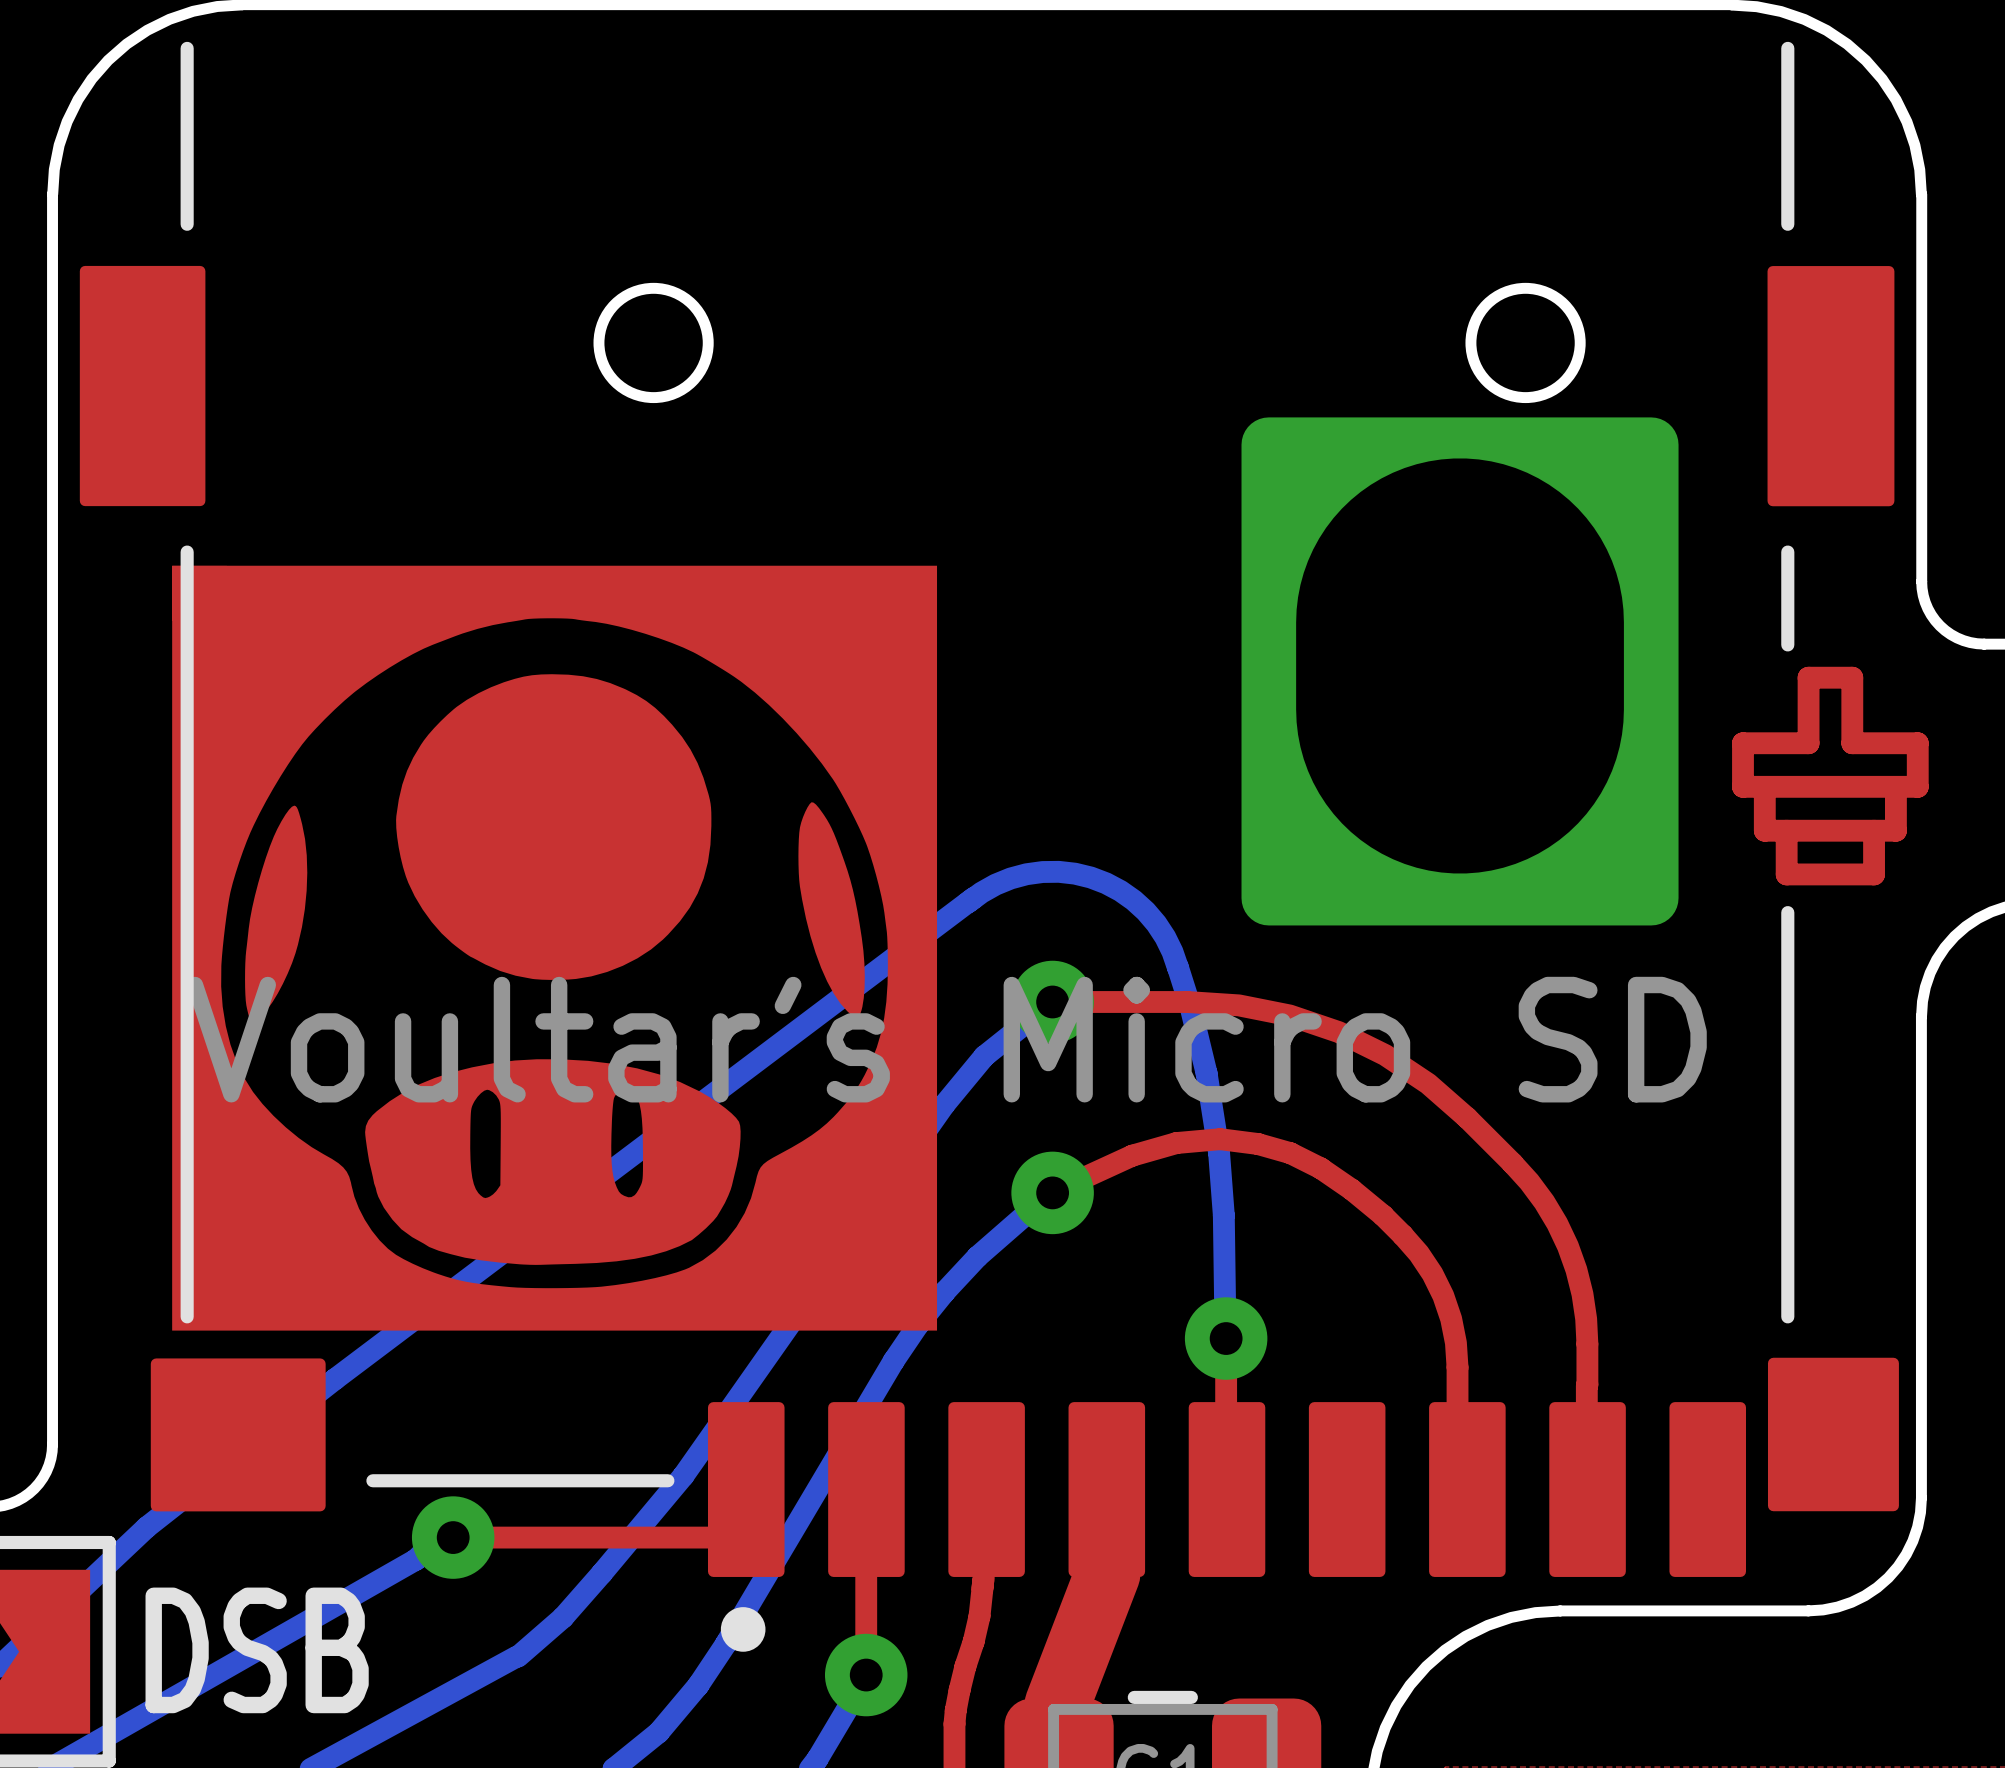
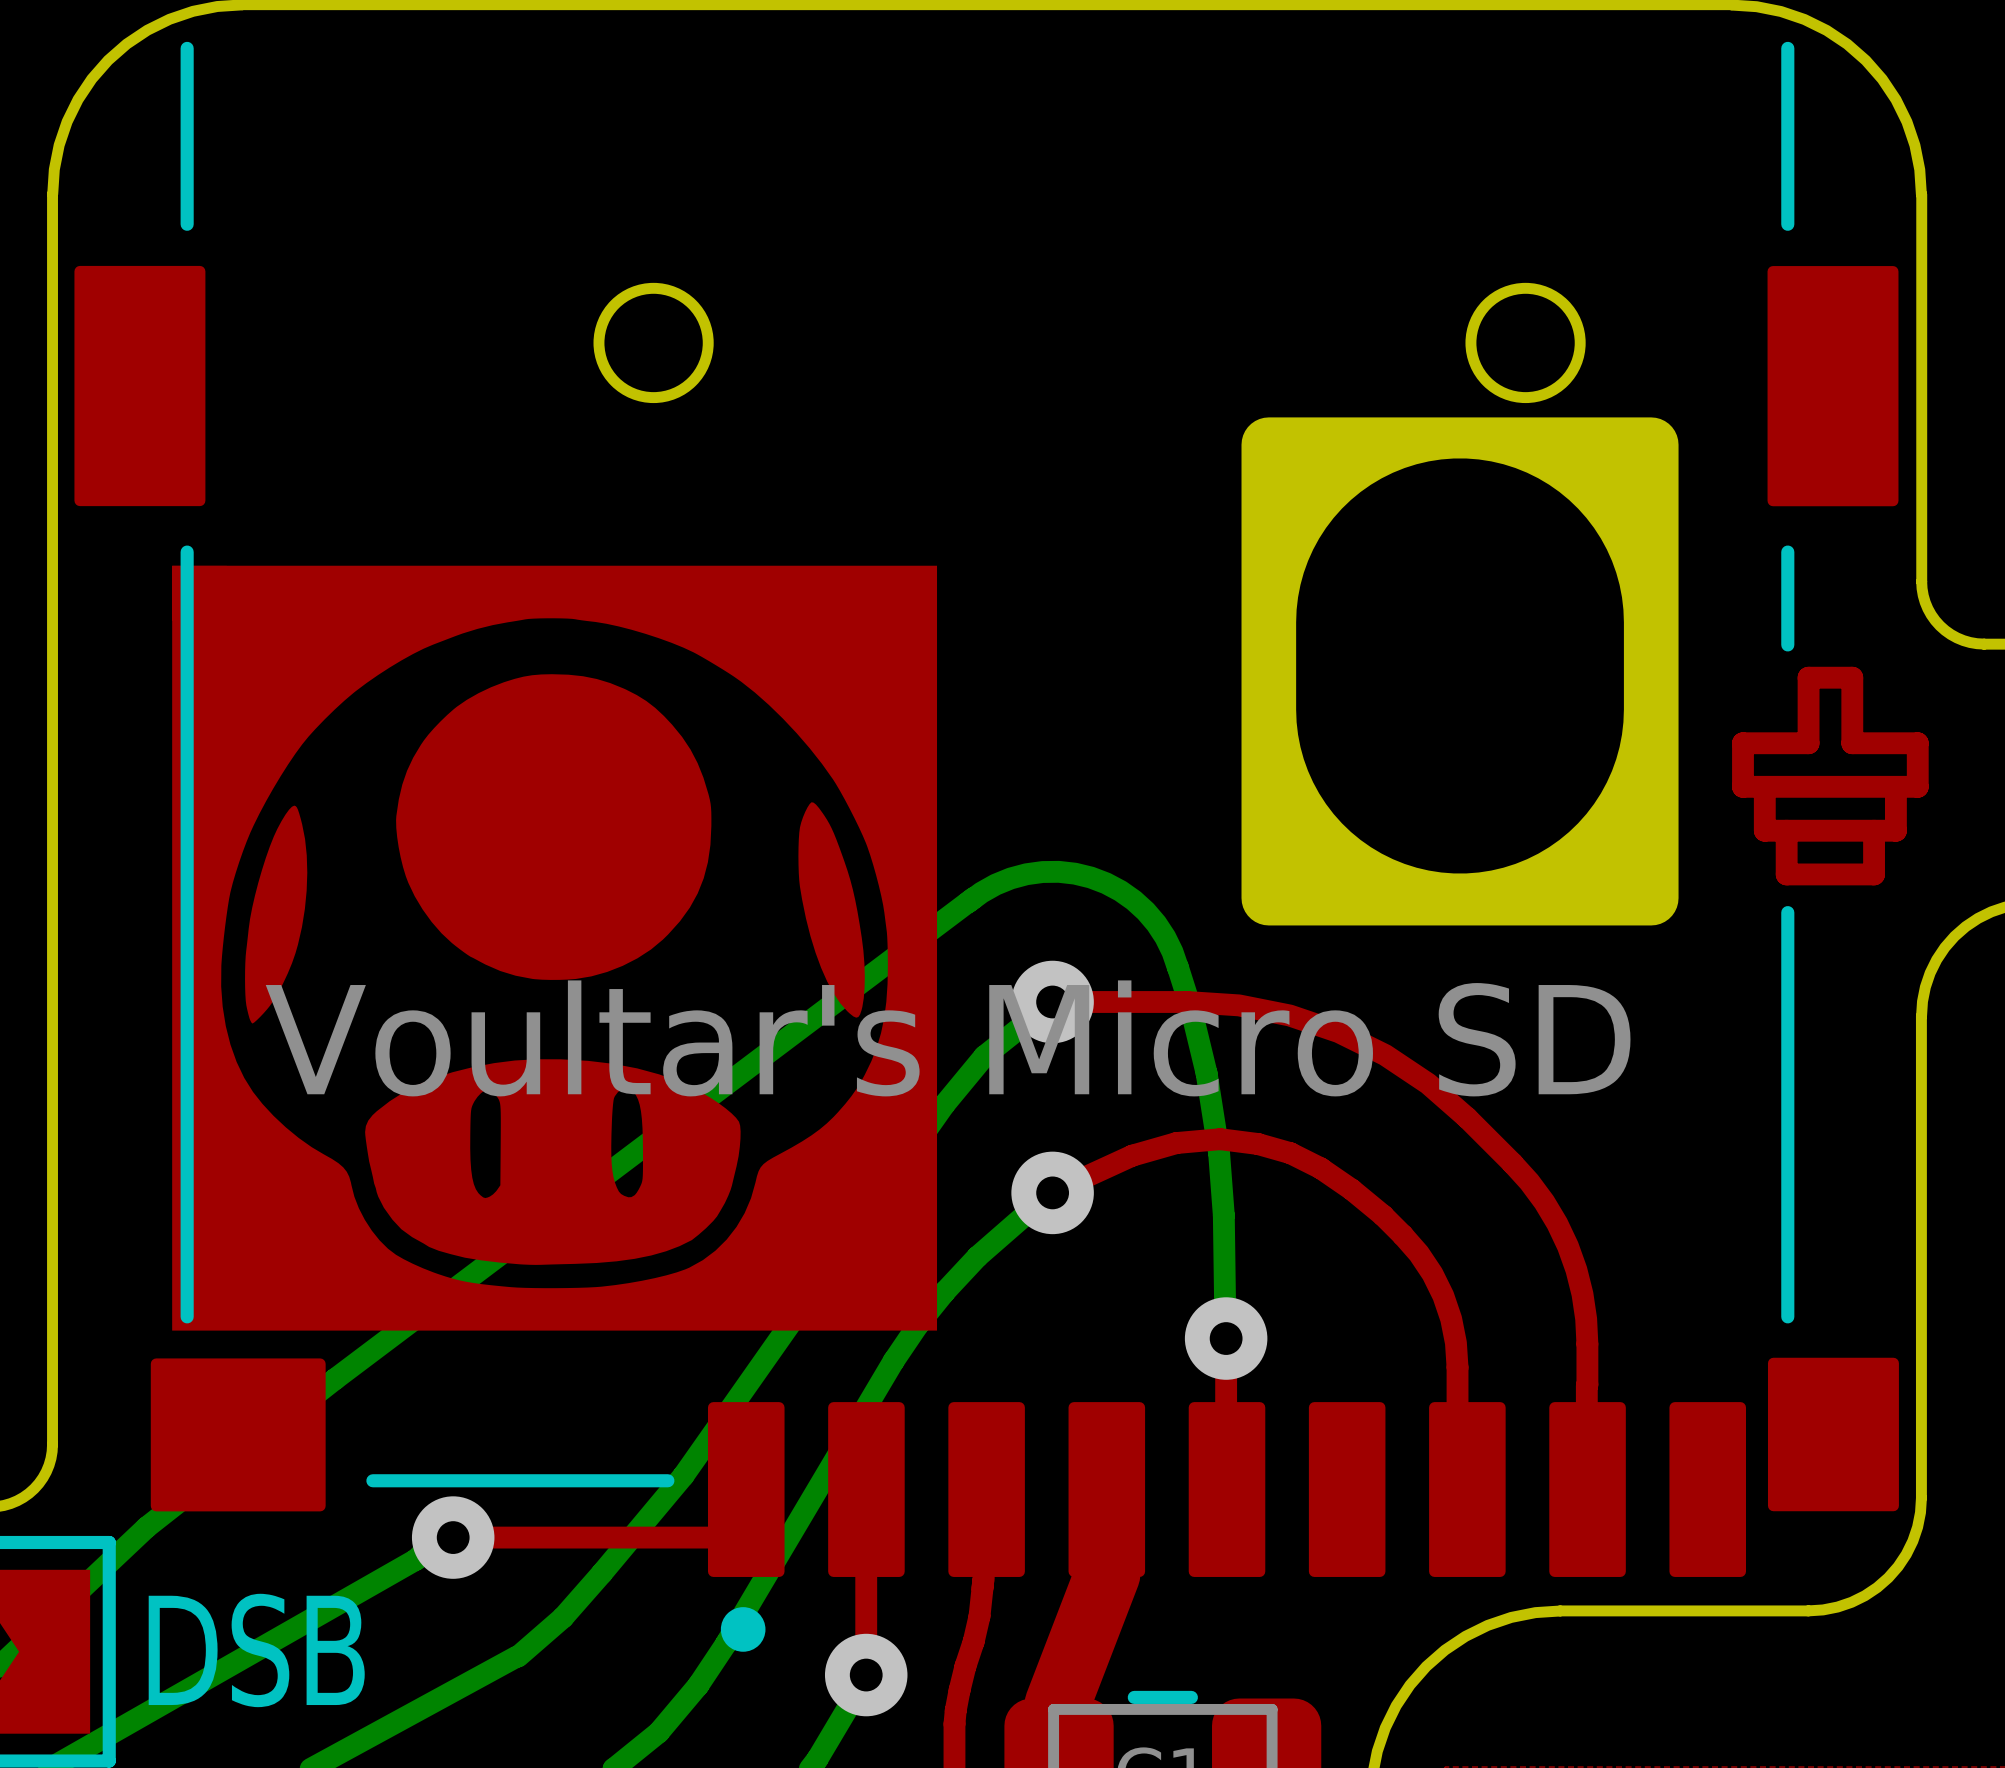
part footprint: [79, 41, 1899, 1652] -> [74, 41, 1899, 1652]

